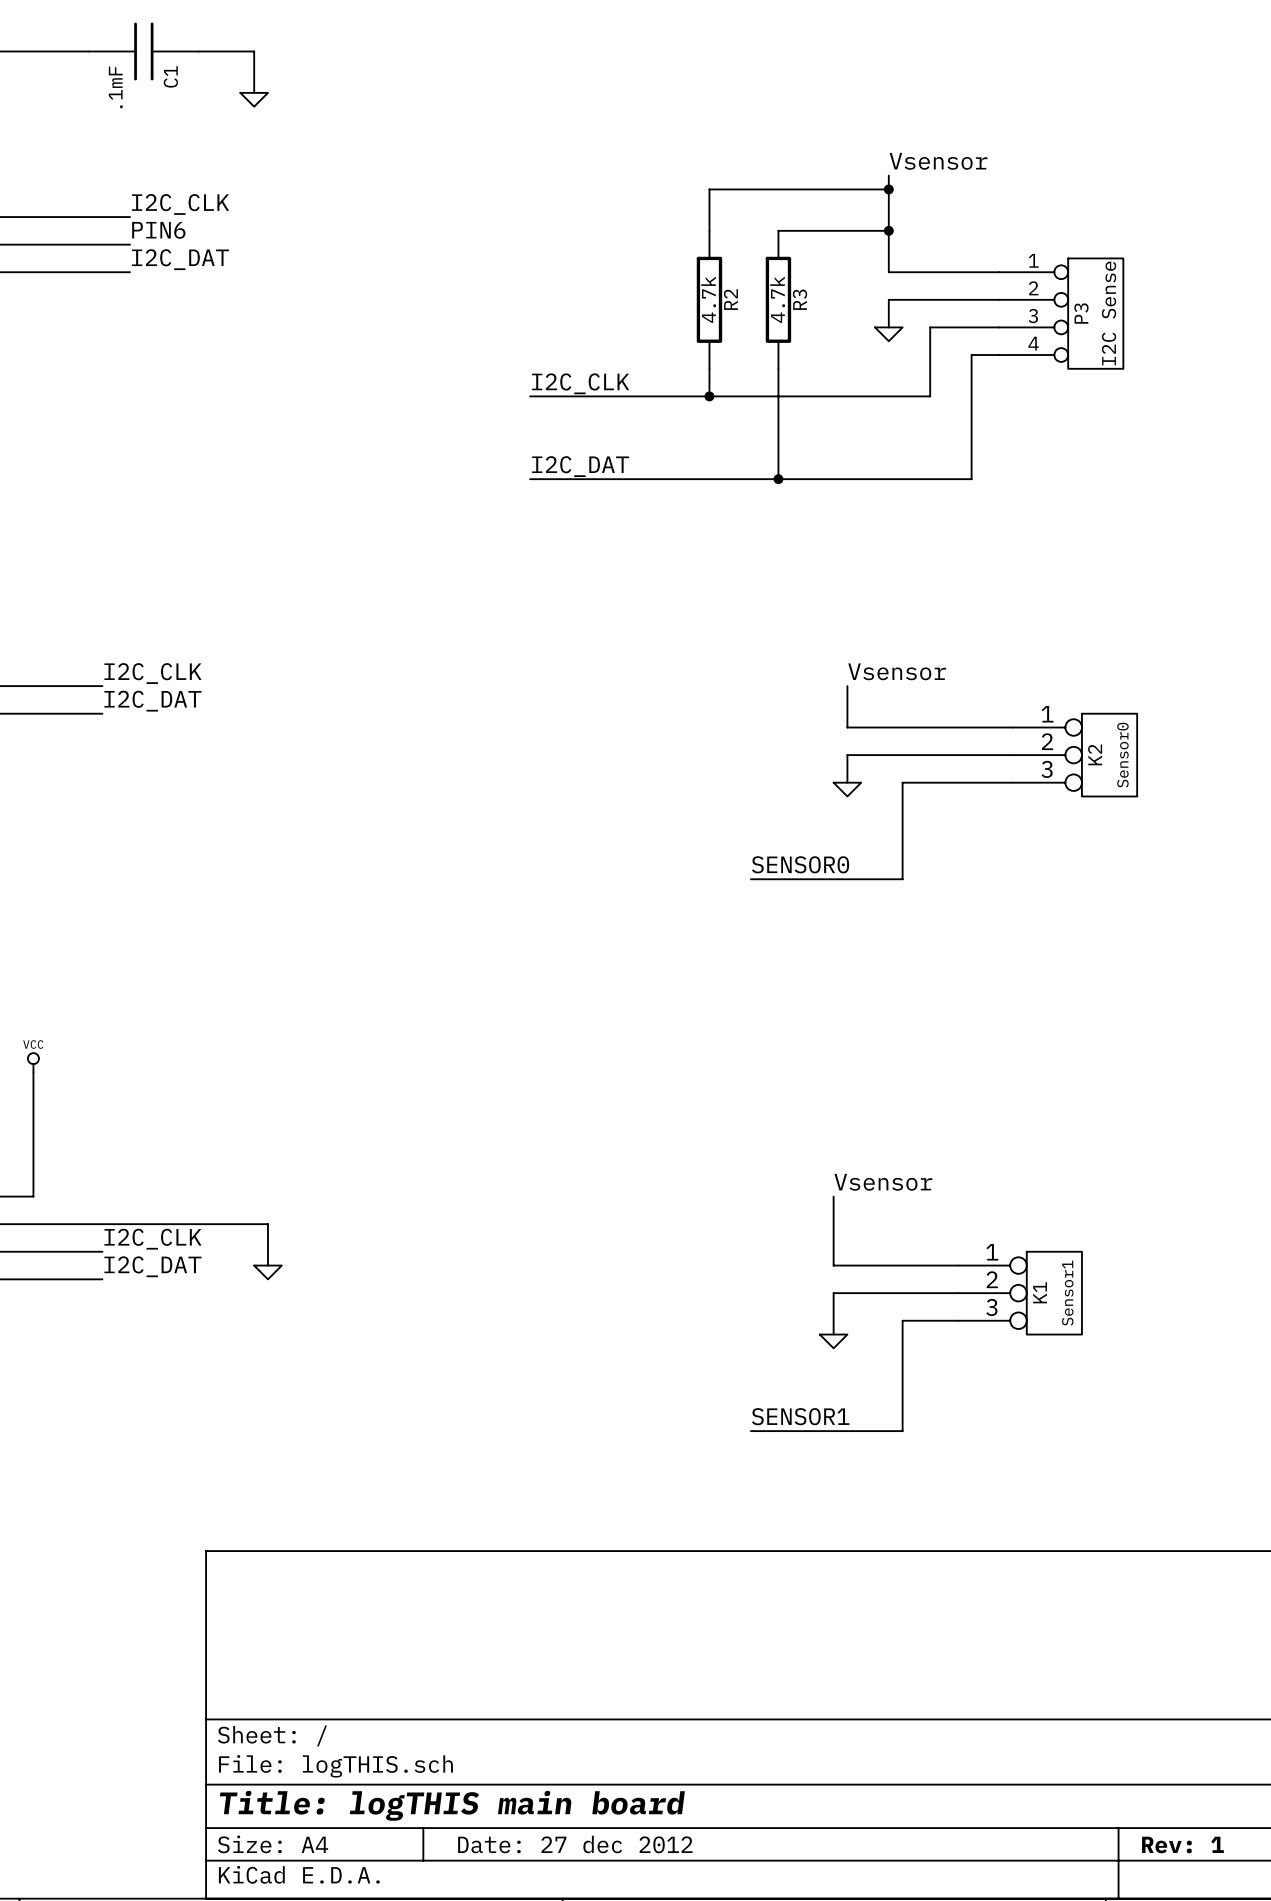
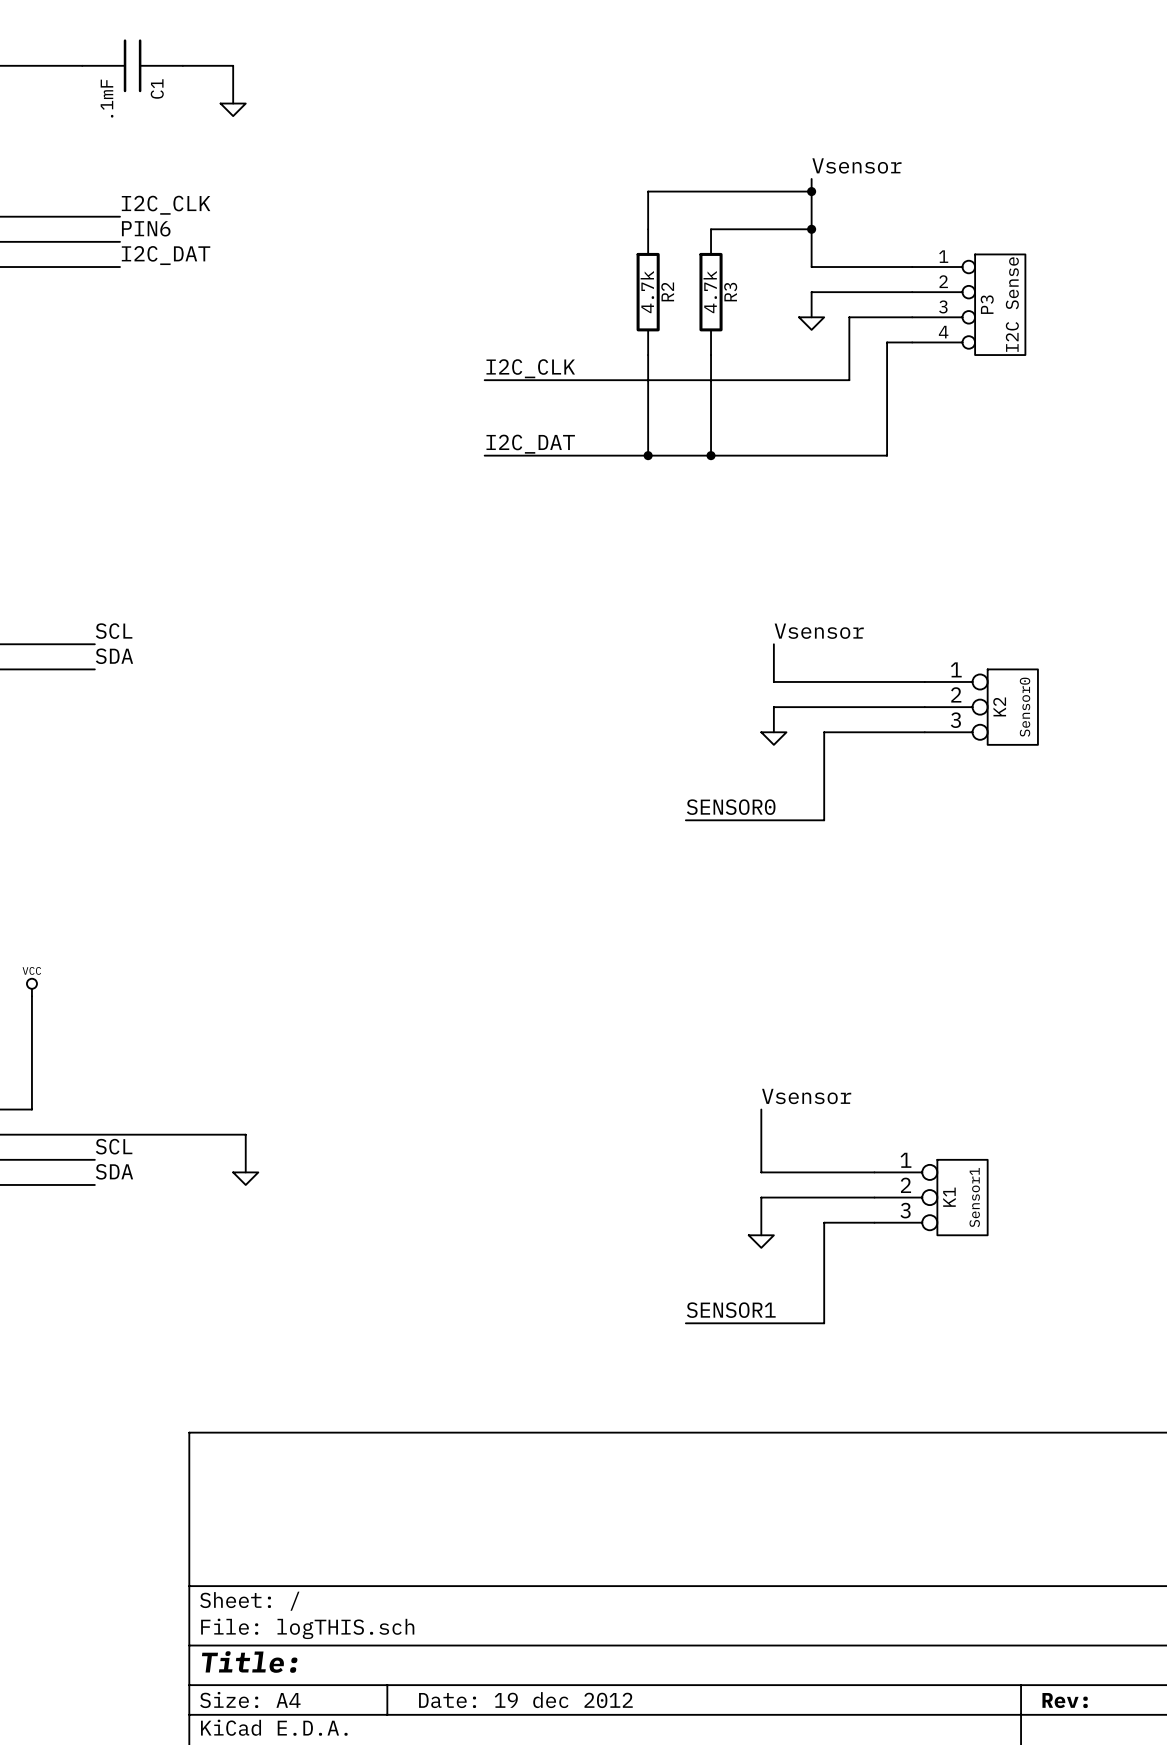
wire: none -> (648, 380) (648, 455)
junction: (709, 396) -> none
junction: none -> (648, 455)
label: I2C_CLK (152, 673) -> SCL (114, 631)
label: I2C_DAT (152, 701) -> SDA (114, 656)
label: I2C_CLK (152, 1239) -> SCL (114, 1146)
label: I2C_DAT (152, 1266) -> SDA (114, 1171)
title block: Title: logTHIS main board (452, 1805) -> Title: (249, 1662)
title block: Date: 27 dec 2012 (575, 1844) -> Date: 19 dec 2012 (525, 1700)
title block: Rev: 1 (1182, 1844) -> Rev: (1065, 1700)

